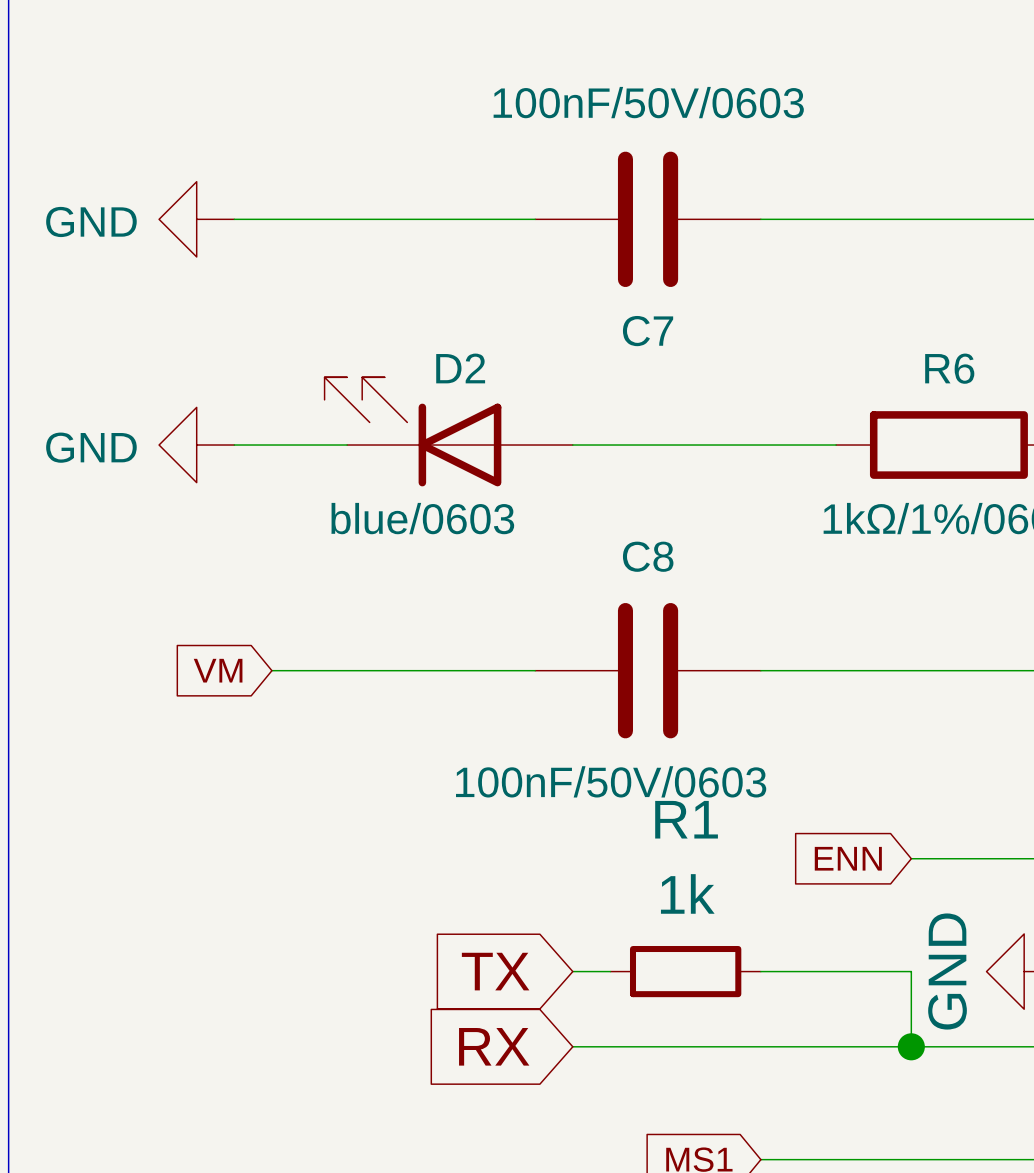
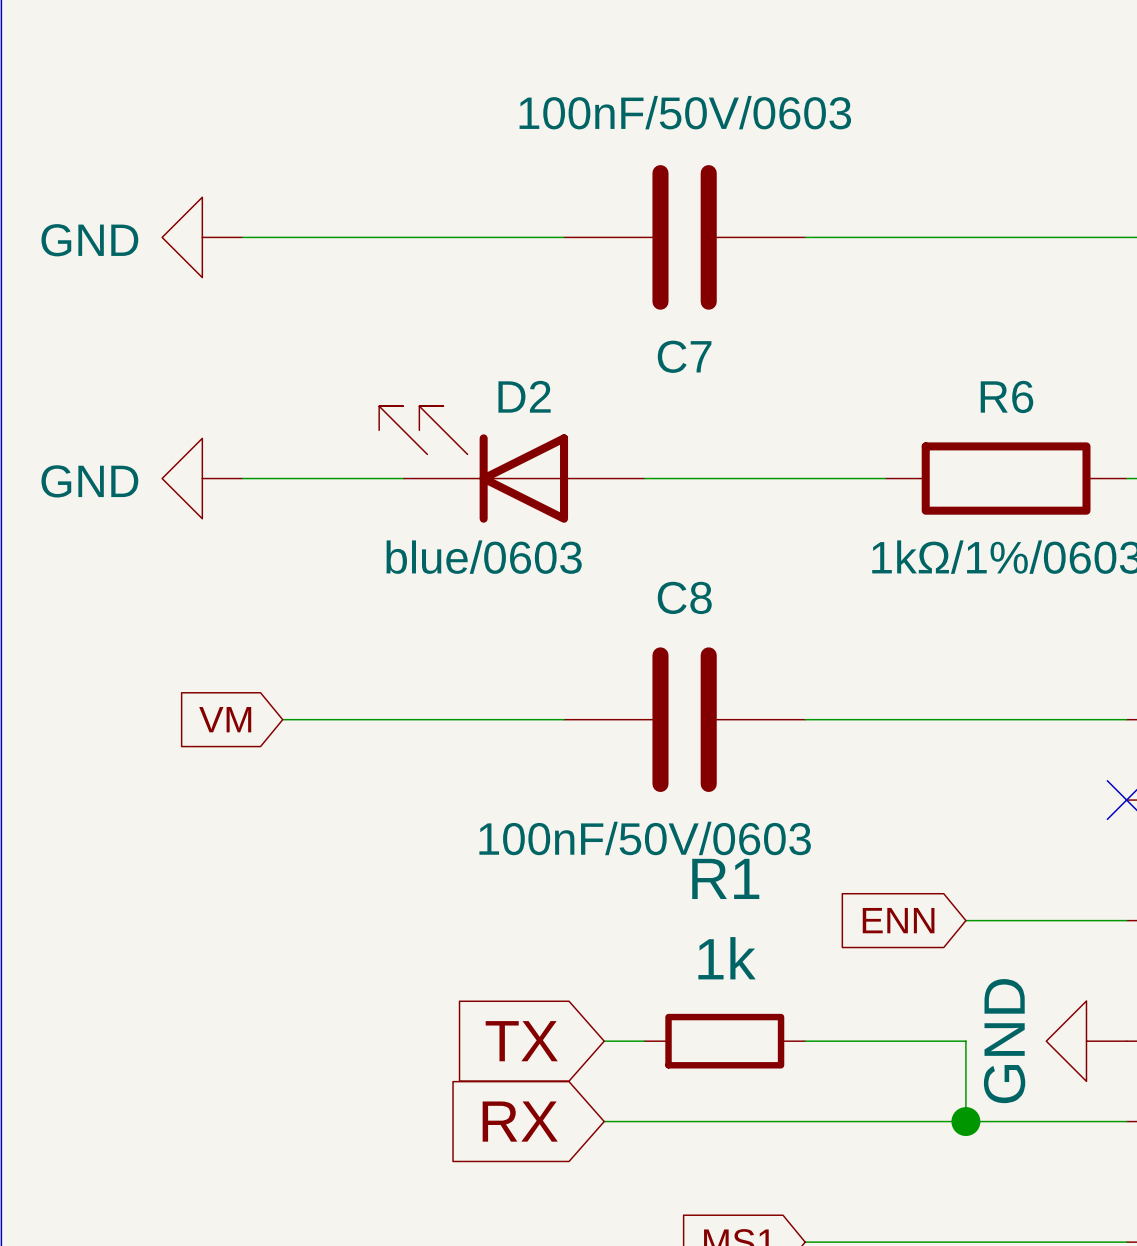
D2 position: (448, 431) -> (511, 464)

